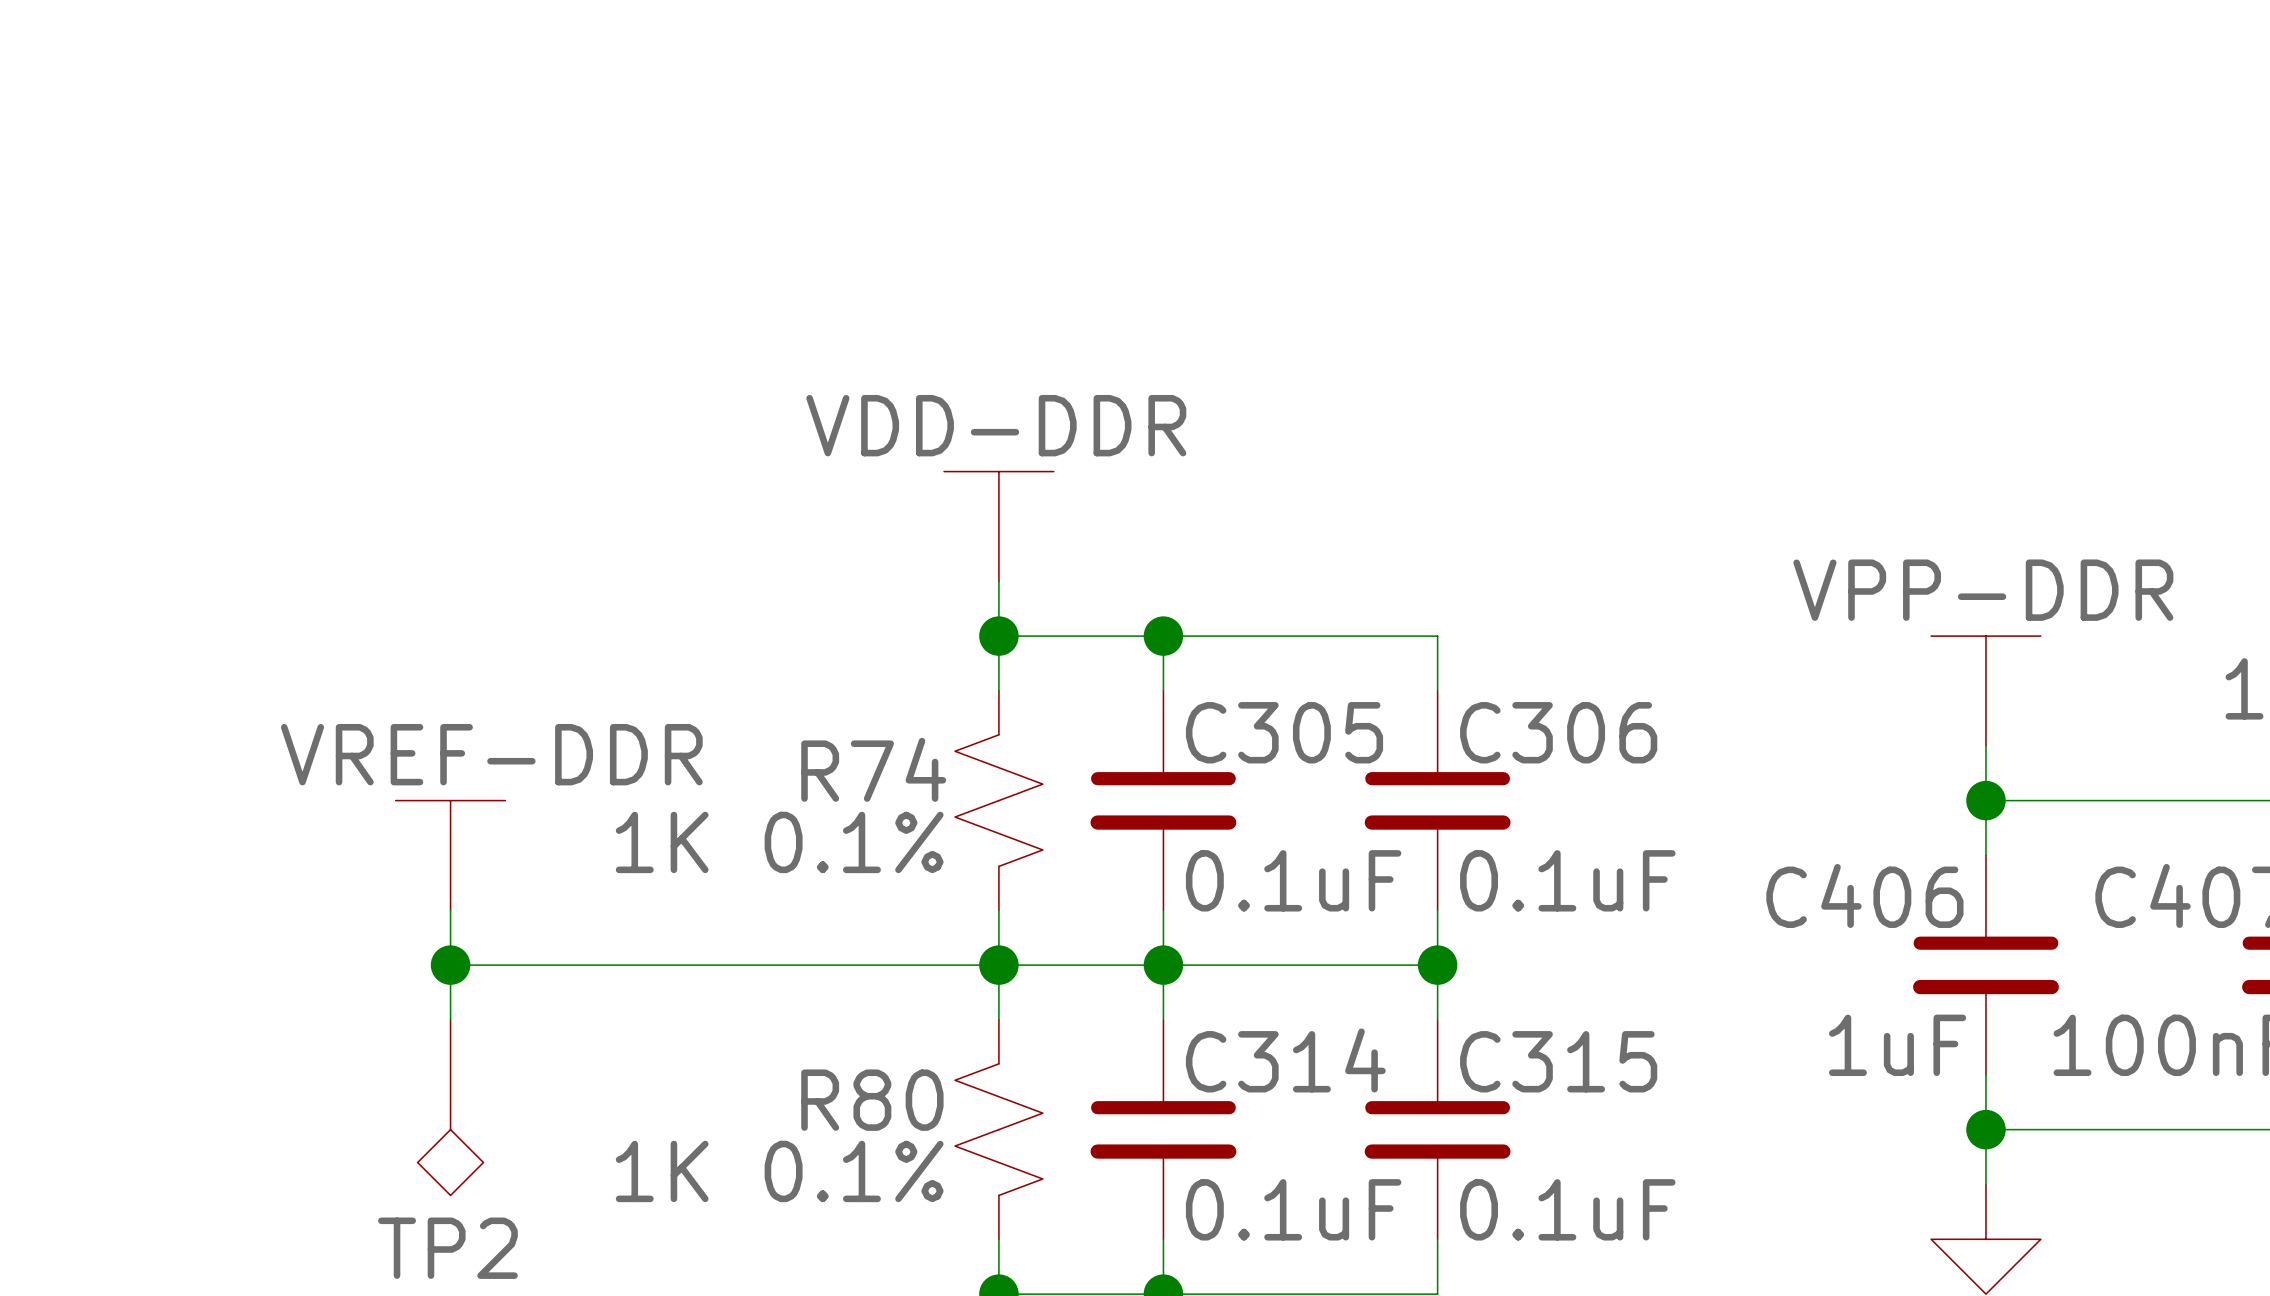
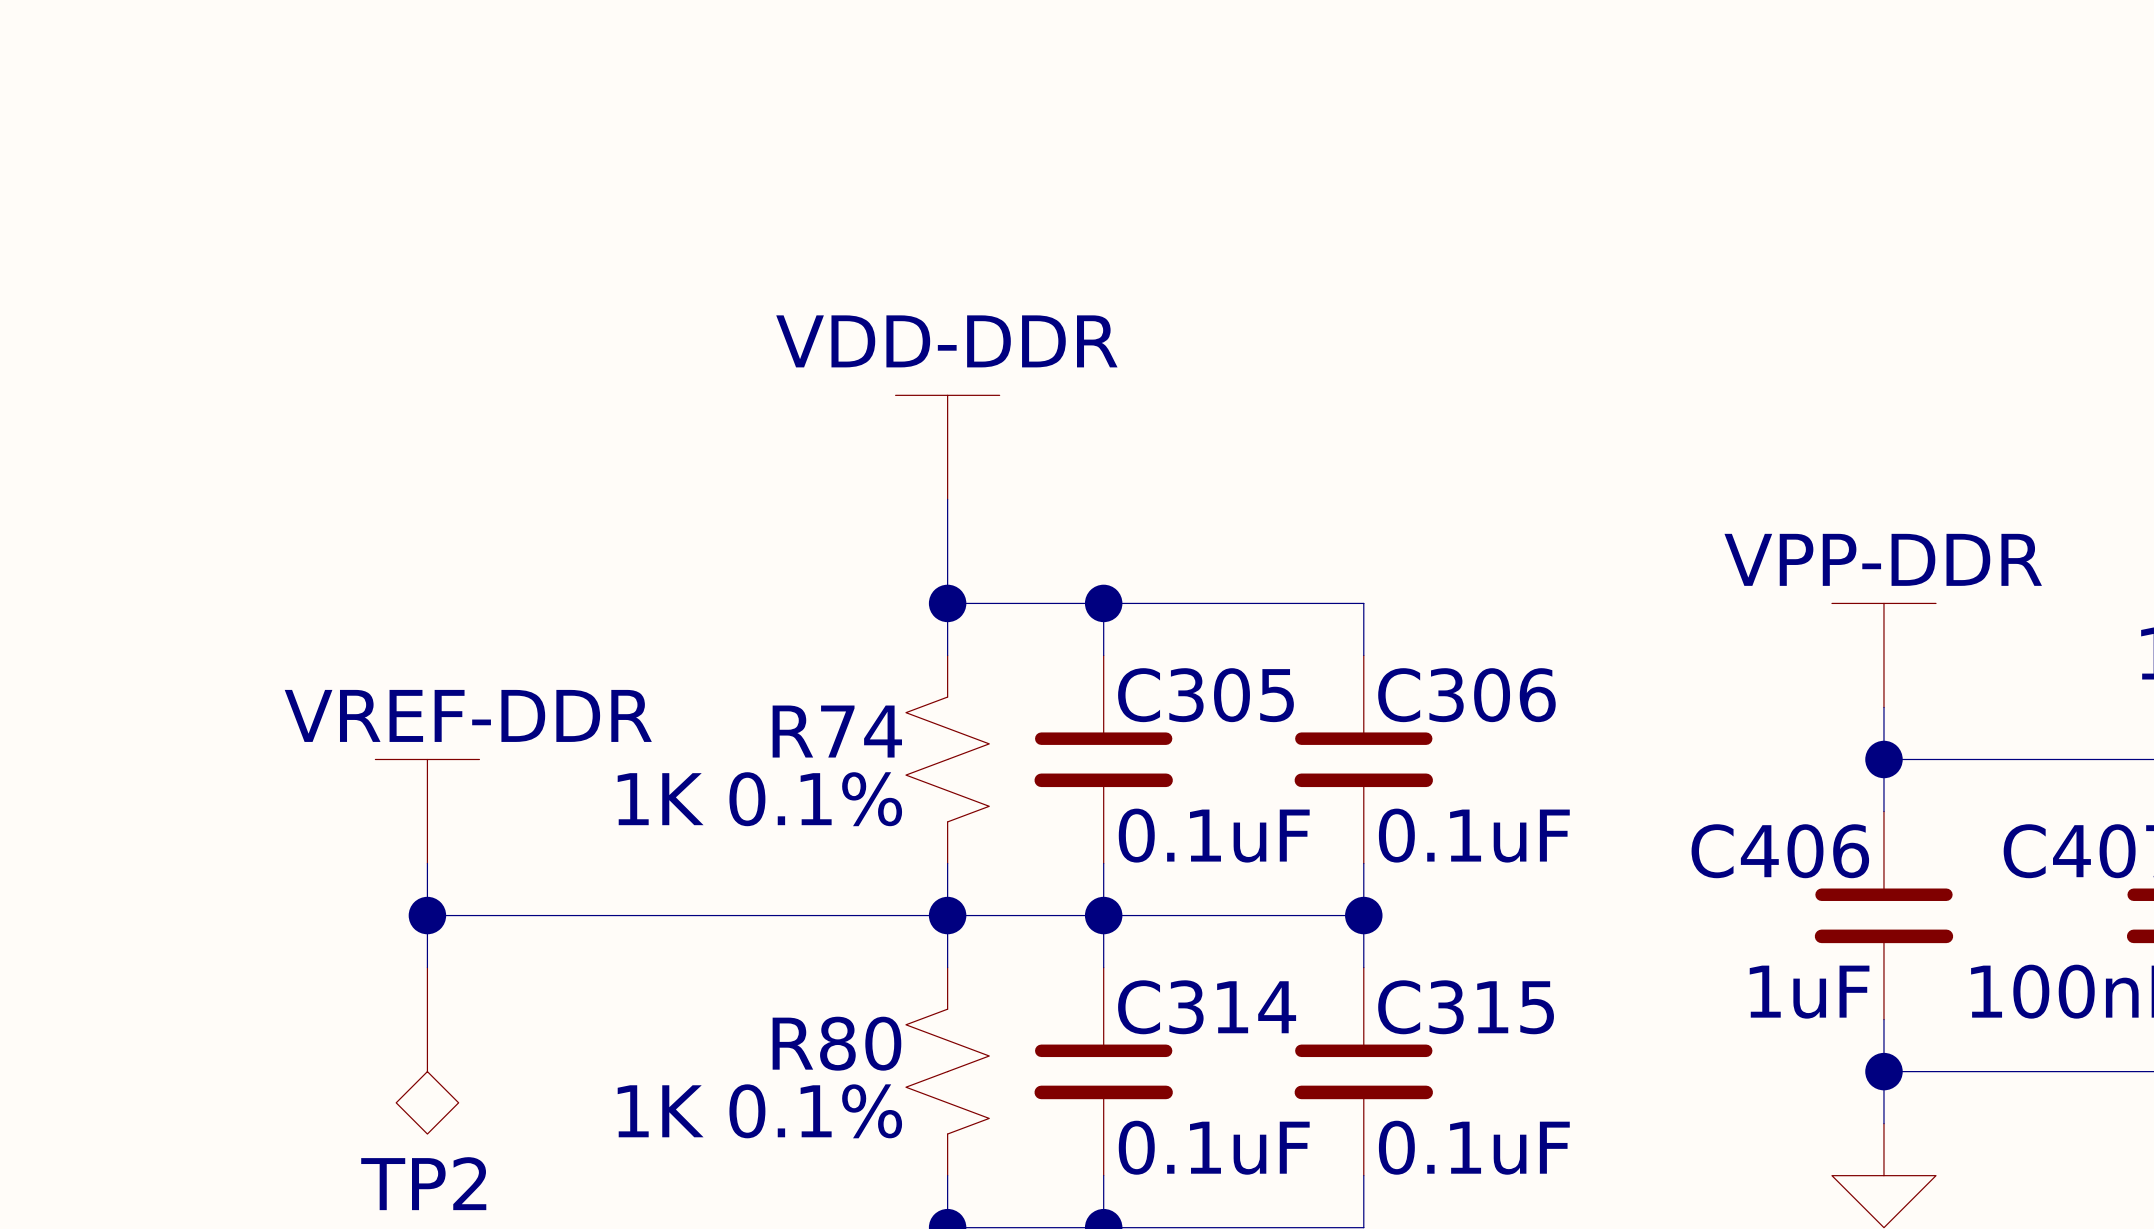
power symbol text position: VDD-DDR (996, 425) -> VDD-DDR (946, 341)
power symbol position: VDD-DDR (998, 526) -> VDD-DDR (947, 447)

